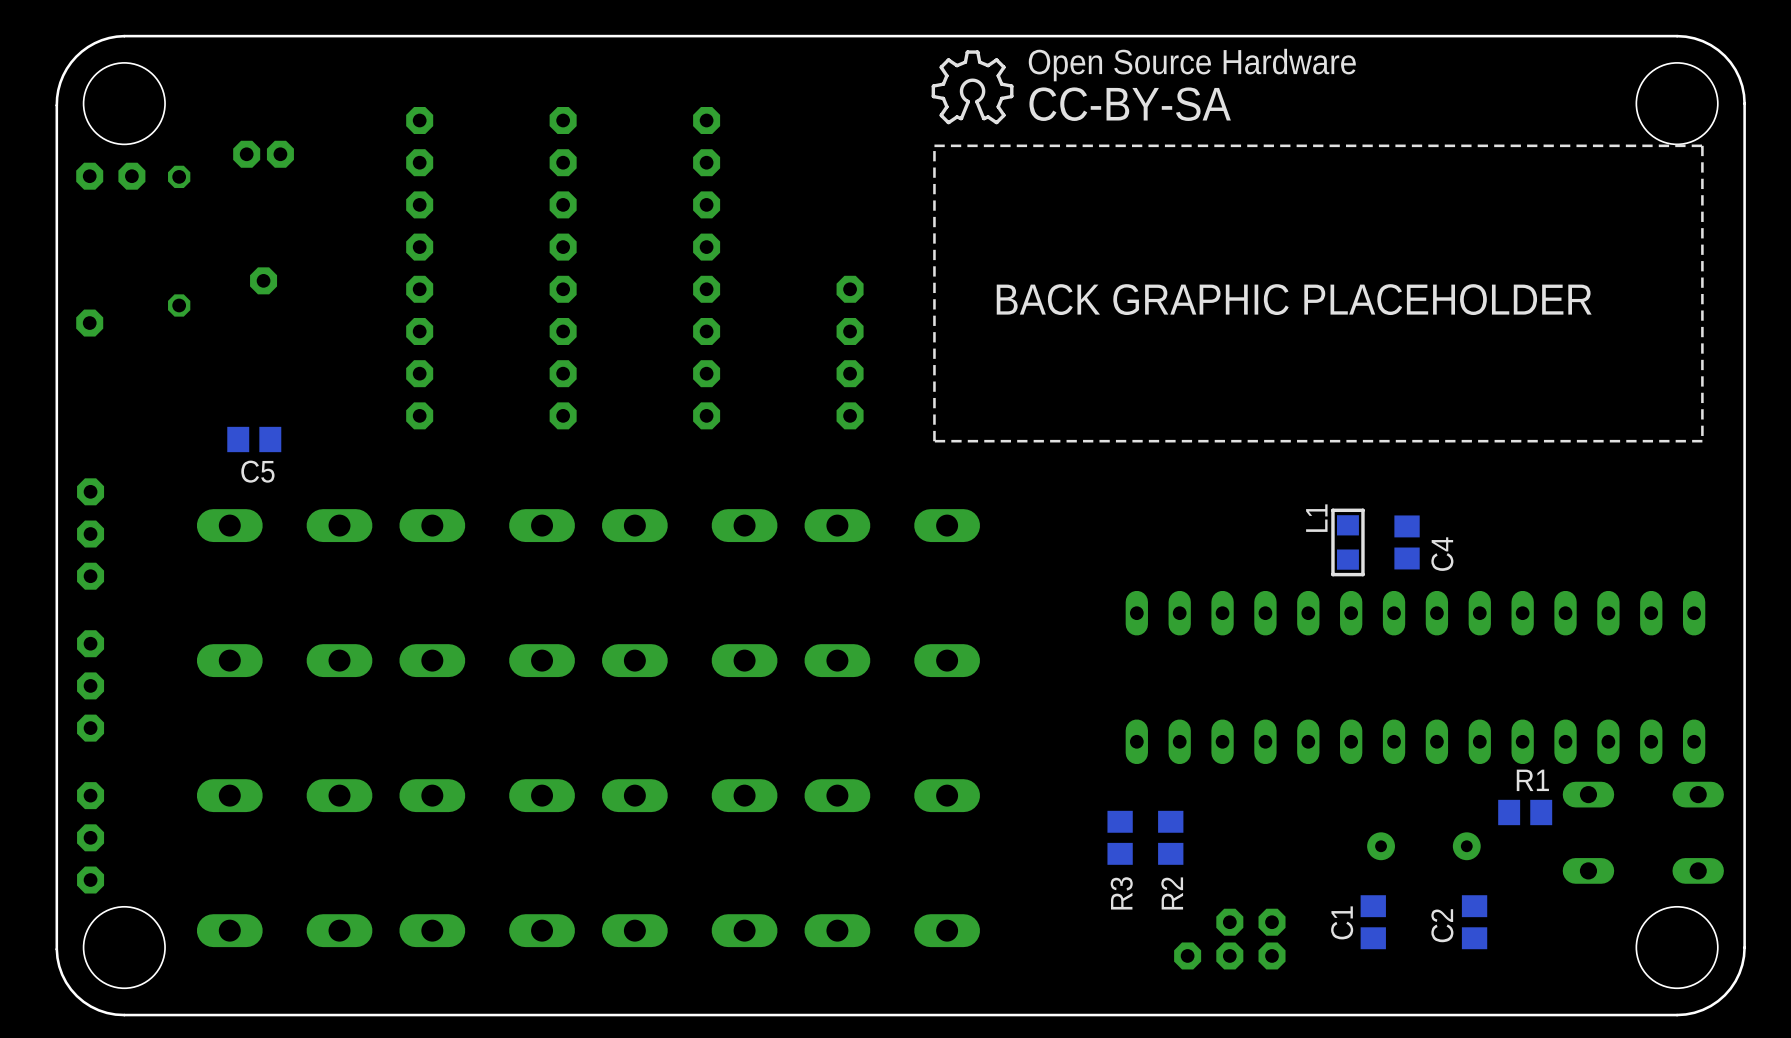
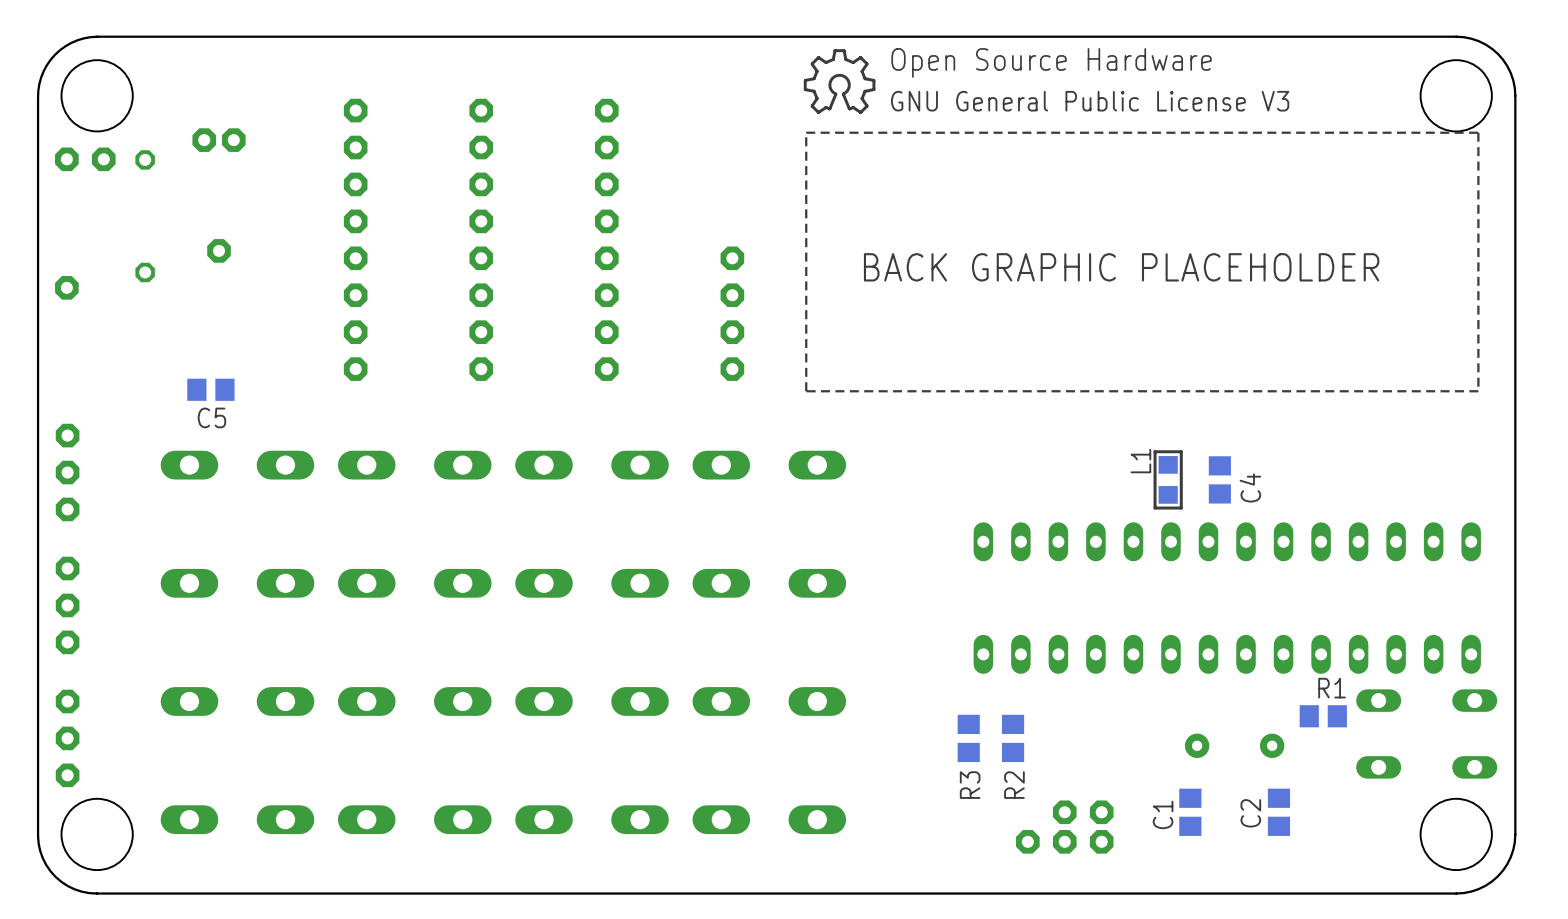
text: CC-BY-SA (1130, 104) -> GNU General Public License V3 (1090, 101)

